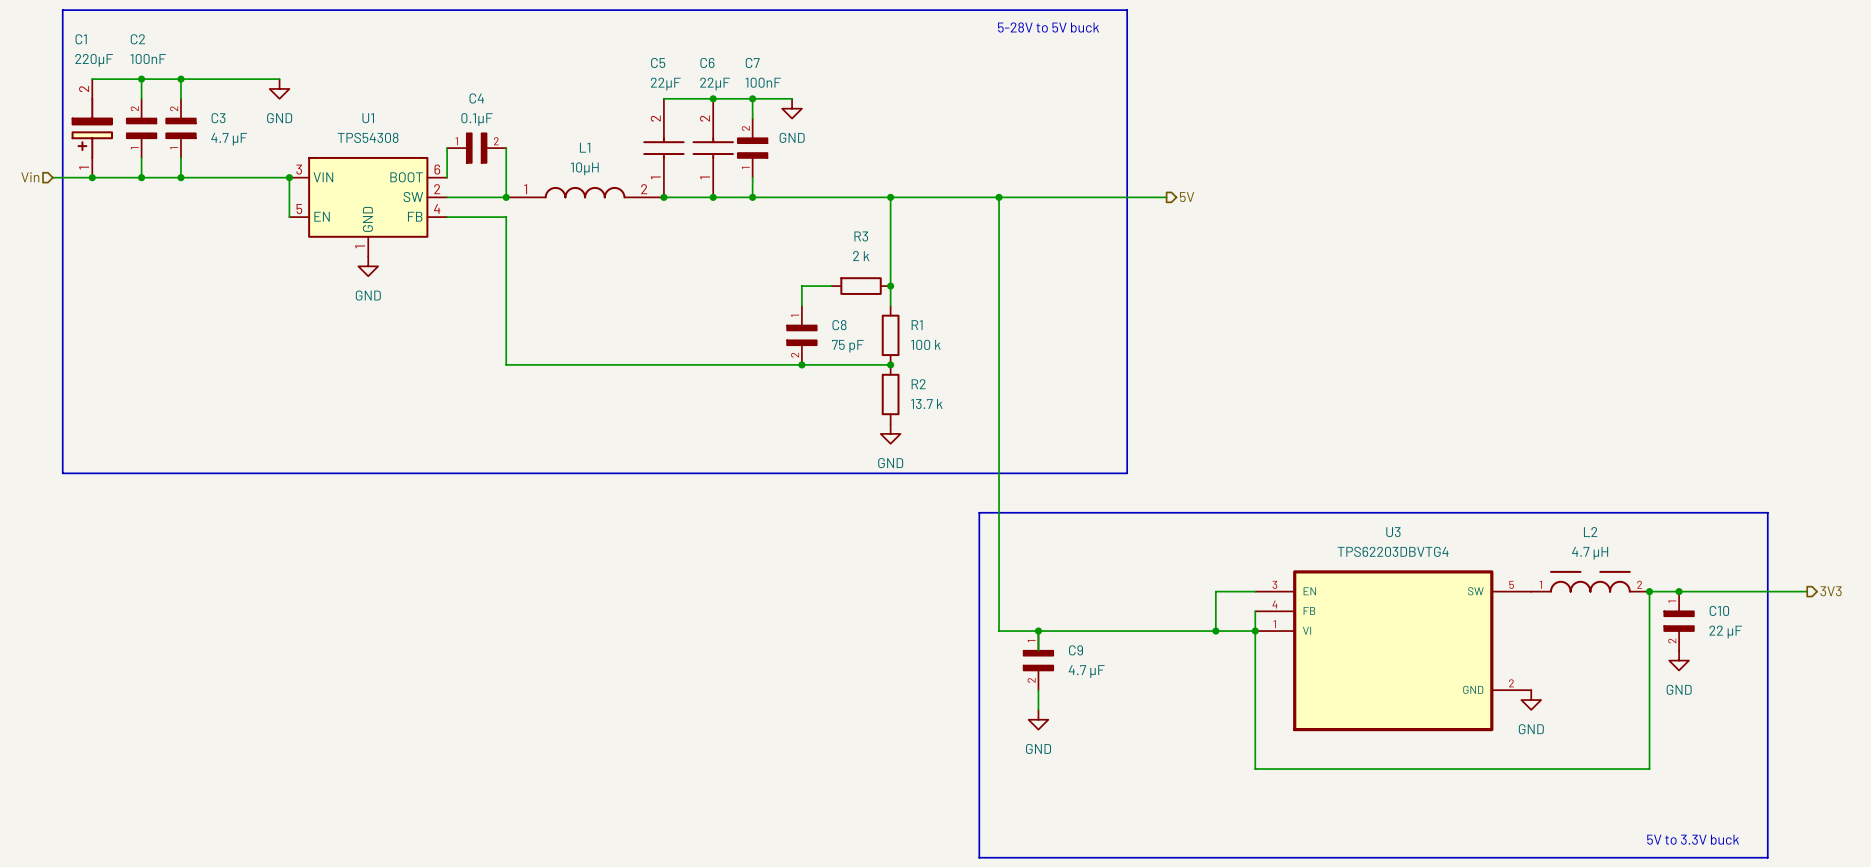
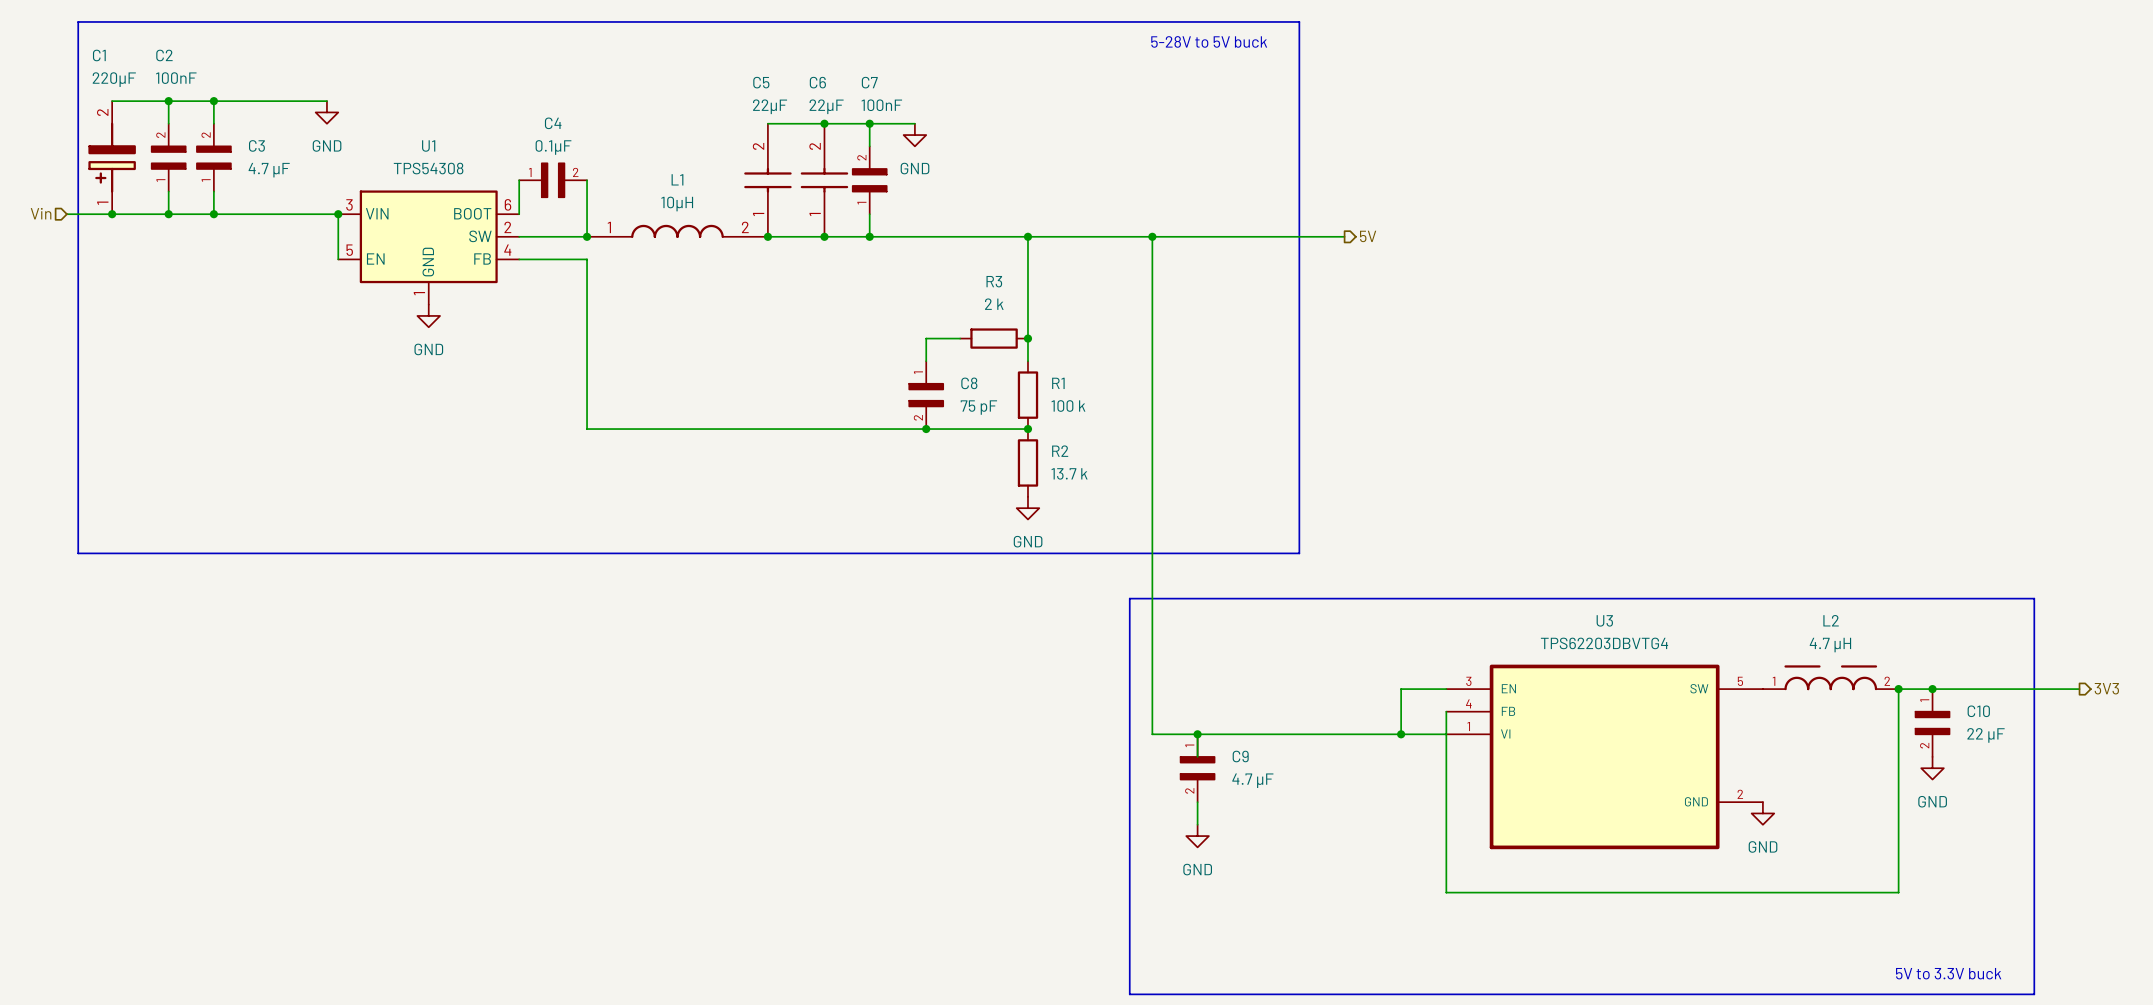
junction: (1255, 631) -> none

